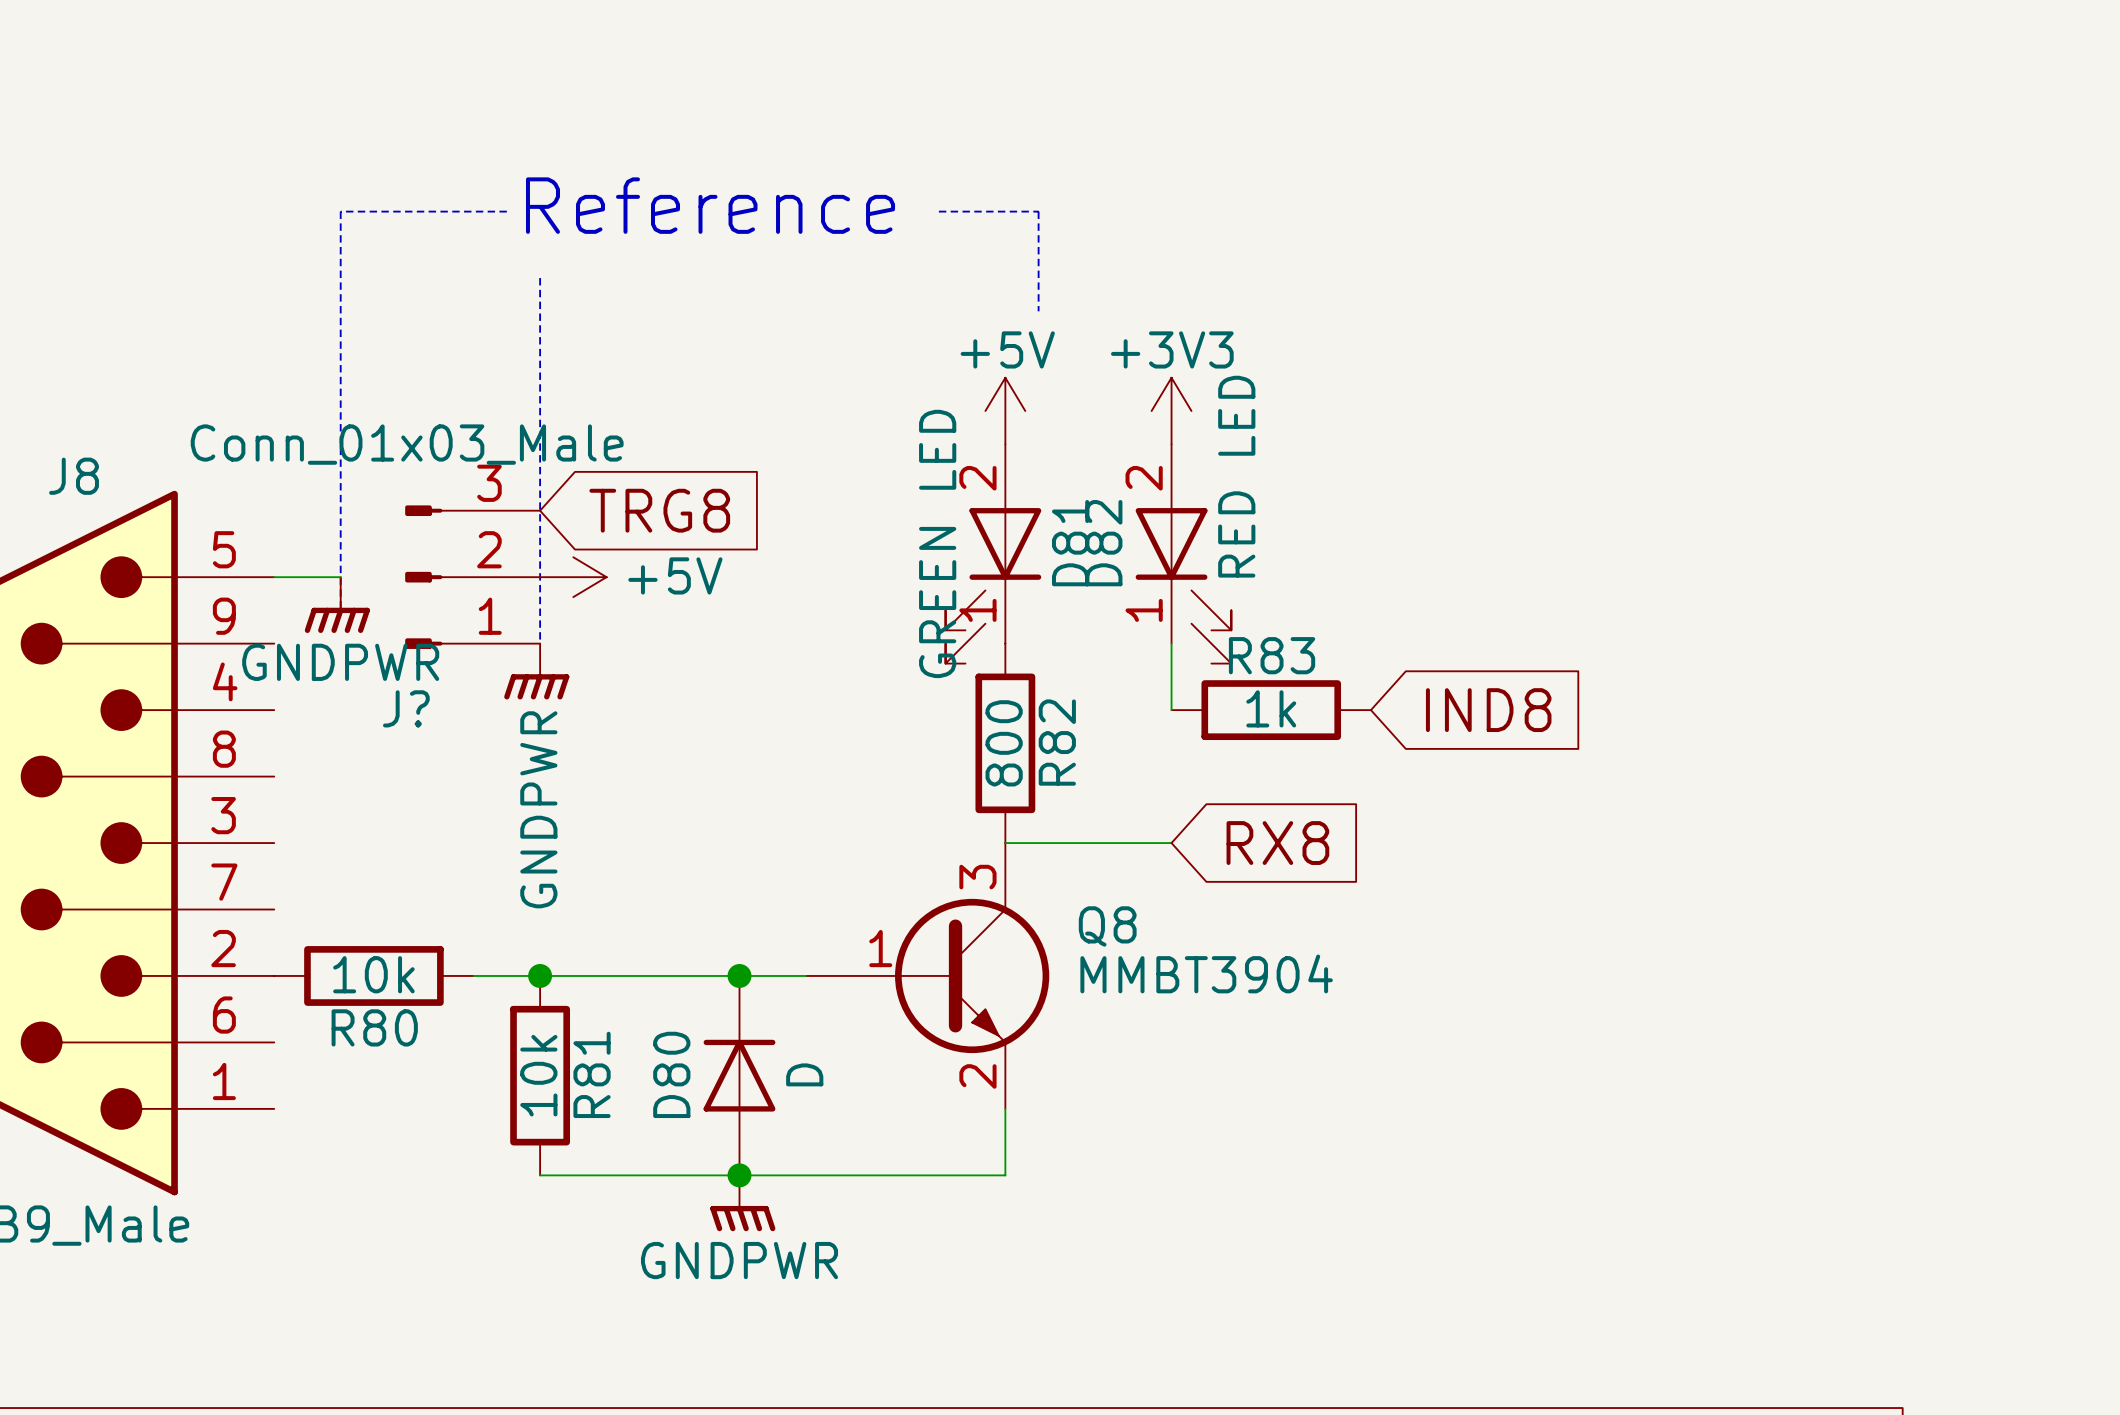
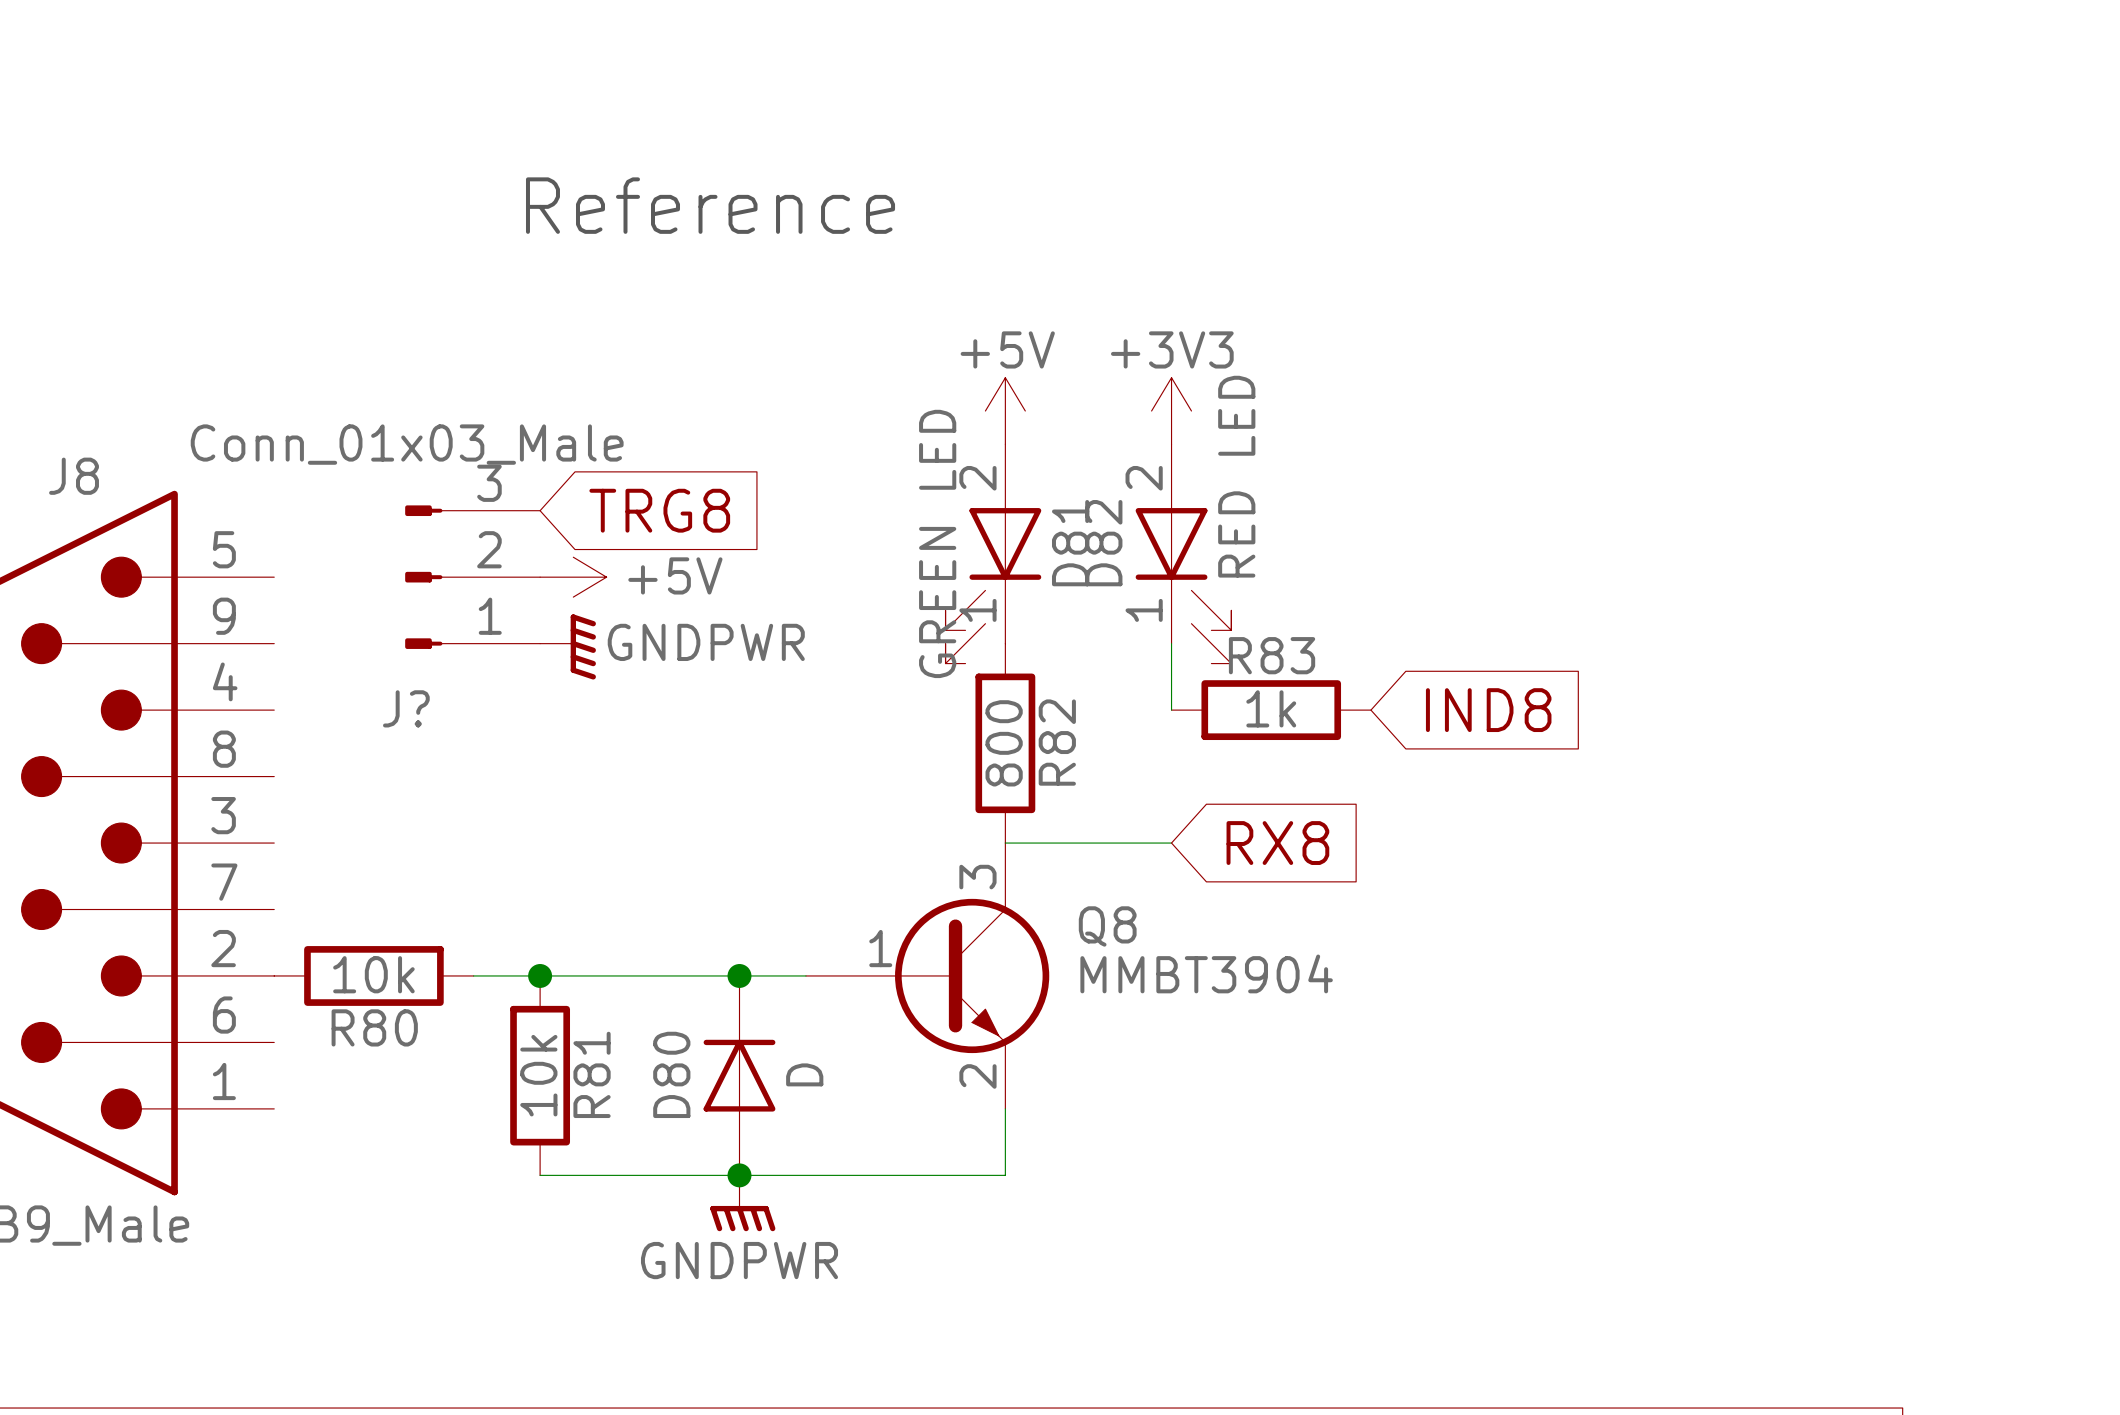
line: (506, 211) (340, 211) (340, 610) -> none
line: (938, 211) (1038, 211) (1038, 311) -> none
line: (540, 278) (540, 643) -> none
wire: (274, 577) (340, 577) -> none
power symbol: GNDPWR (337, 605) -> none
power symbol rotation: 0° (536, 671) -> 90° counterclockwise (568, 646)
power symbol position: GNDPWR (536, 671) -> GNDPWR (568, 646)

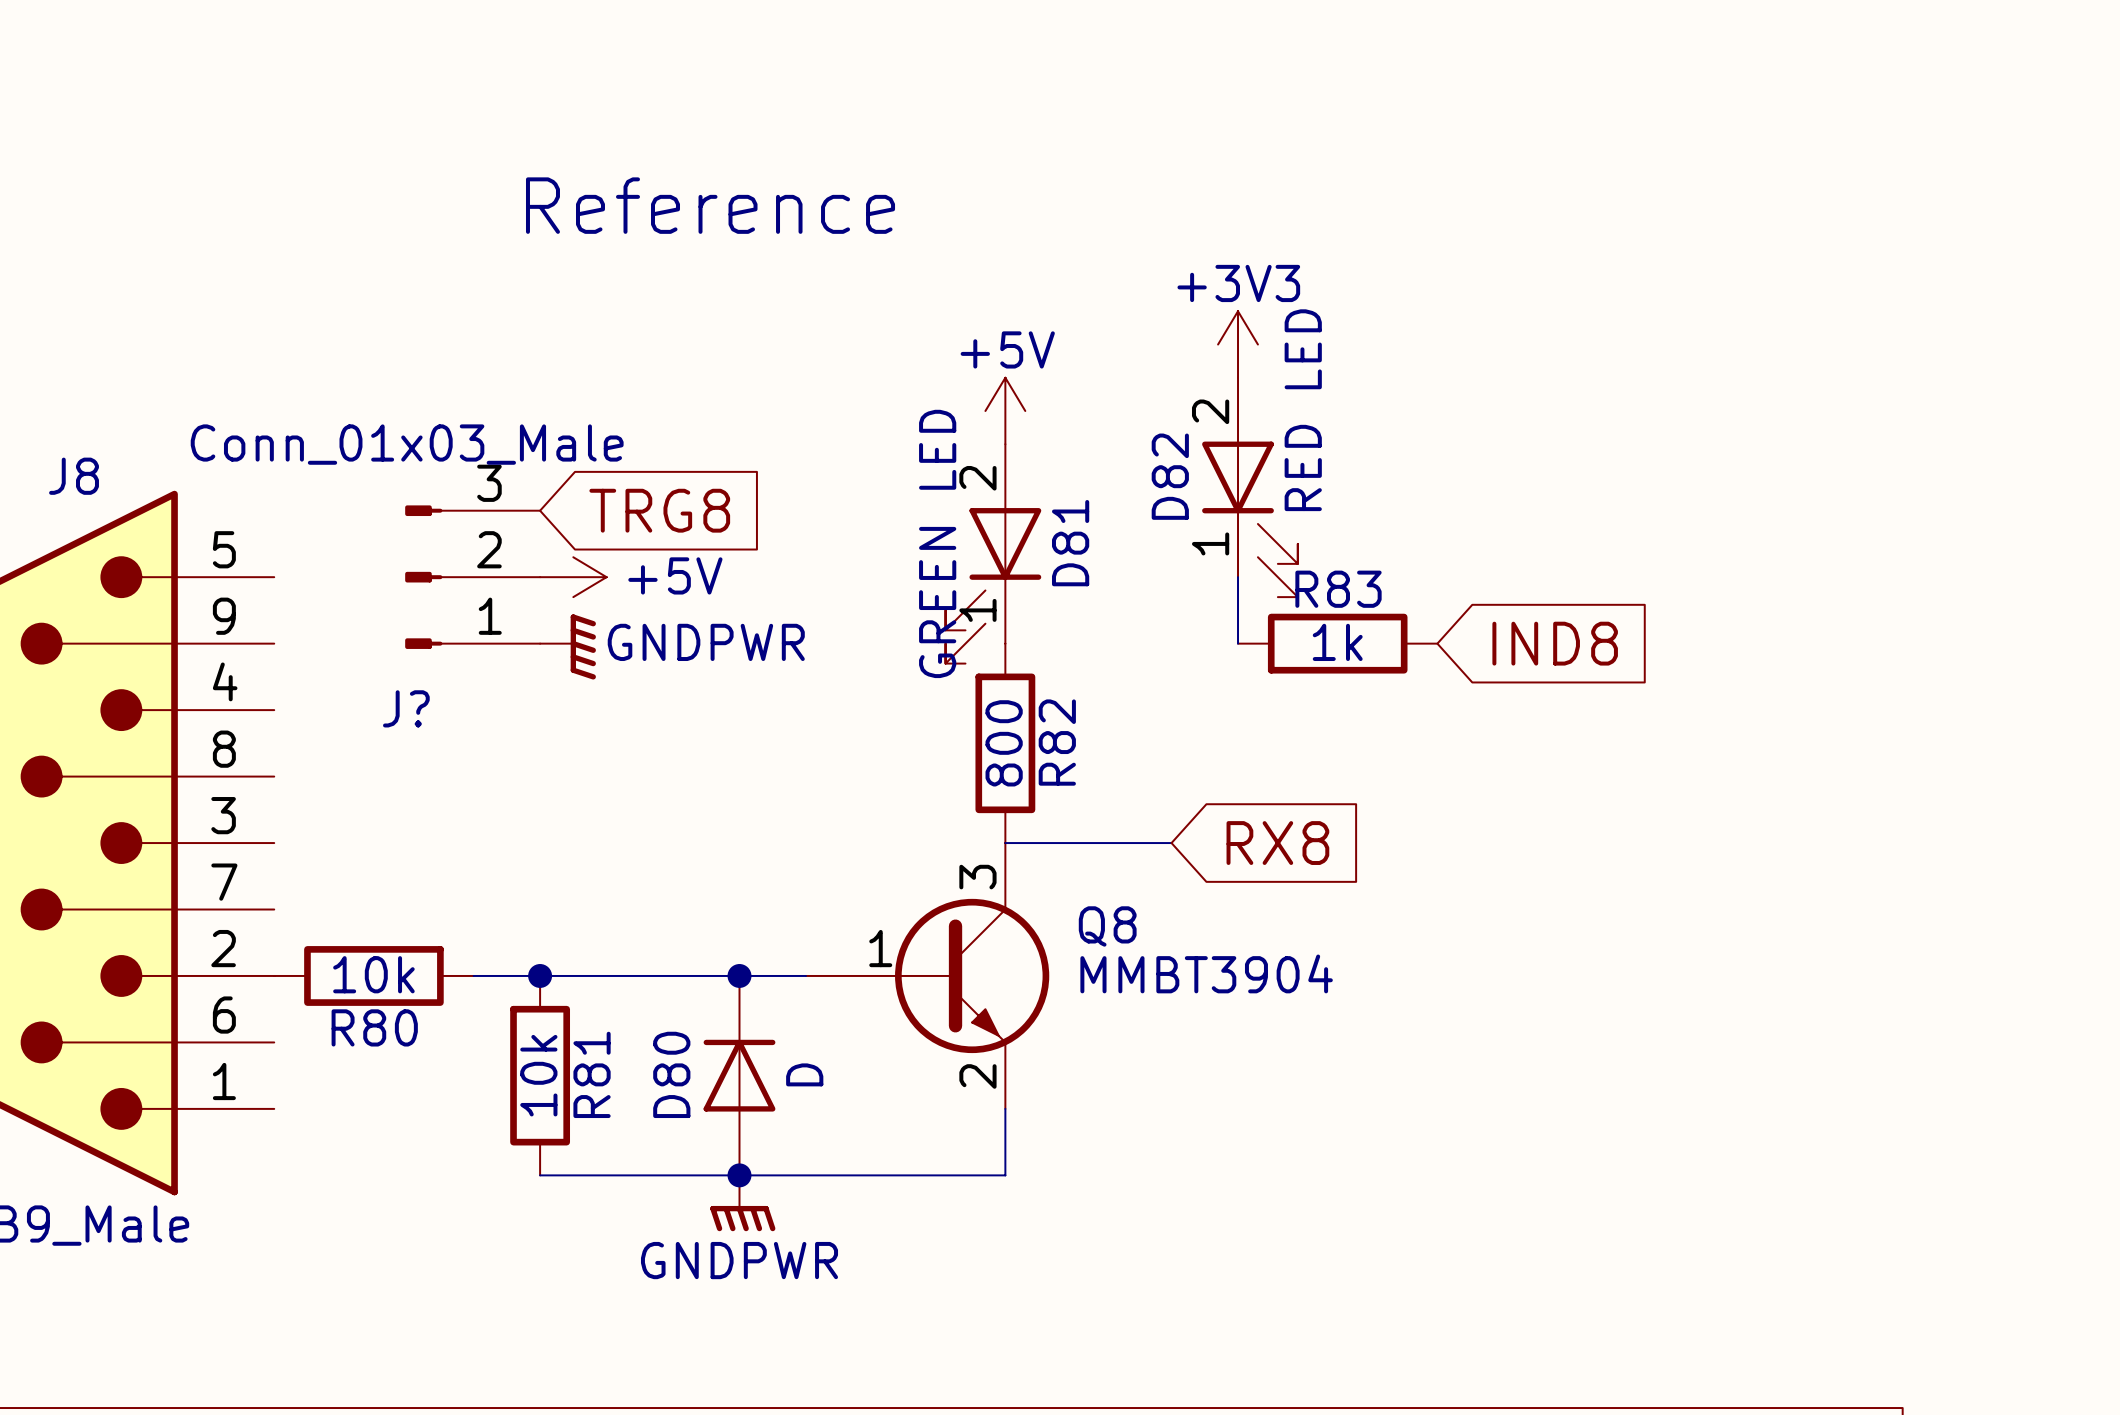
power symbol position: +3V3 (1171, 411) -> +3V3 (1238, 344)
D82 position: (1183, 553) -> (1249, 487)
wire: (1171, 643) (1171, 710) -> (1238, 577) (1238, 643)
R83 position: (1271, 710) -> (1337, 643)
global label position: IND8 (1488, 710) -> IND8 (1555, 643)

